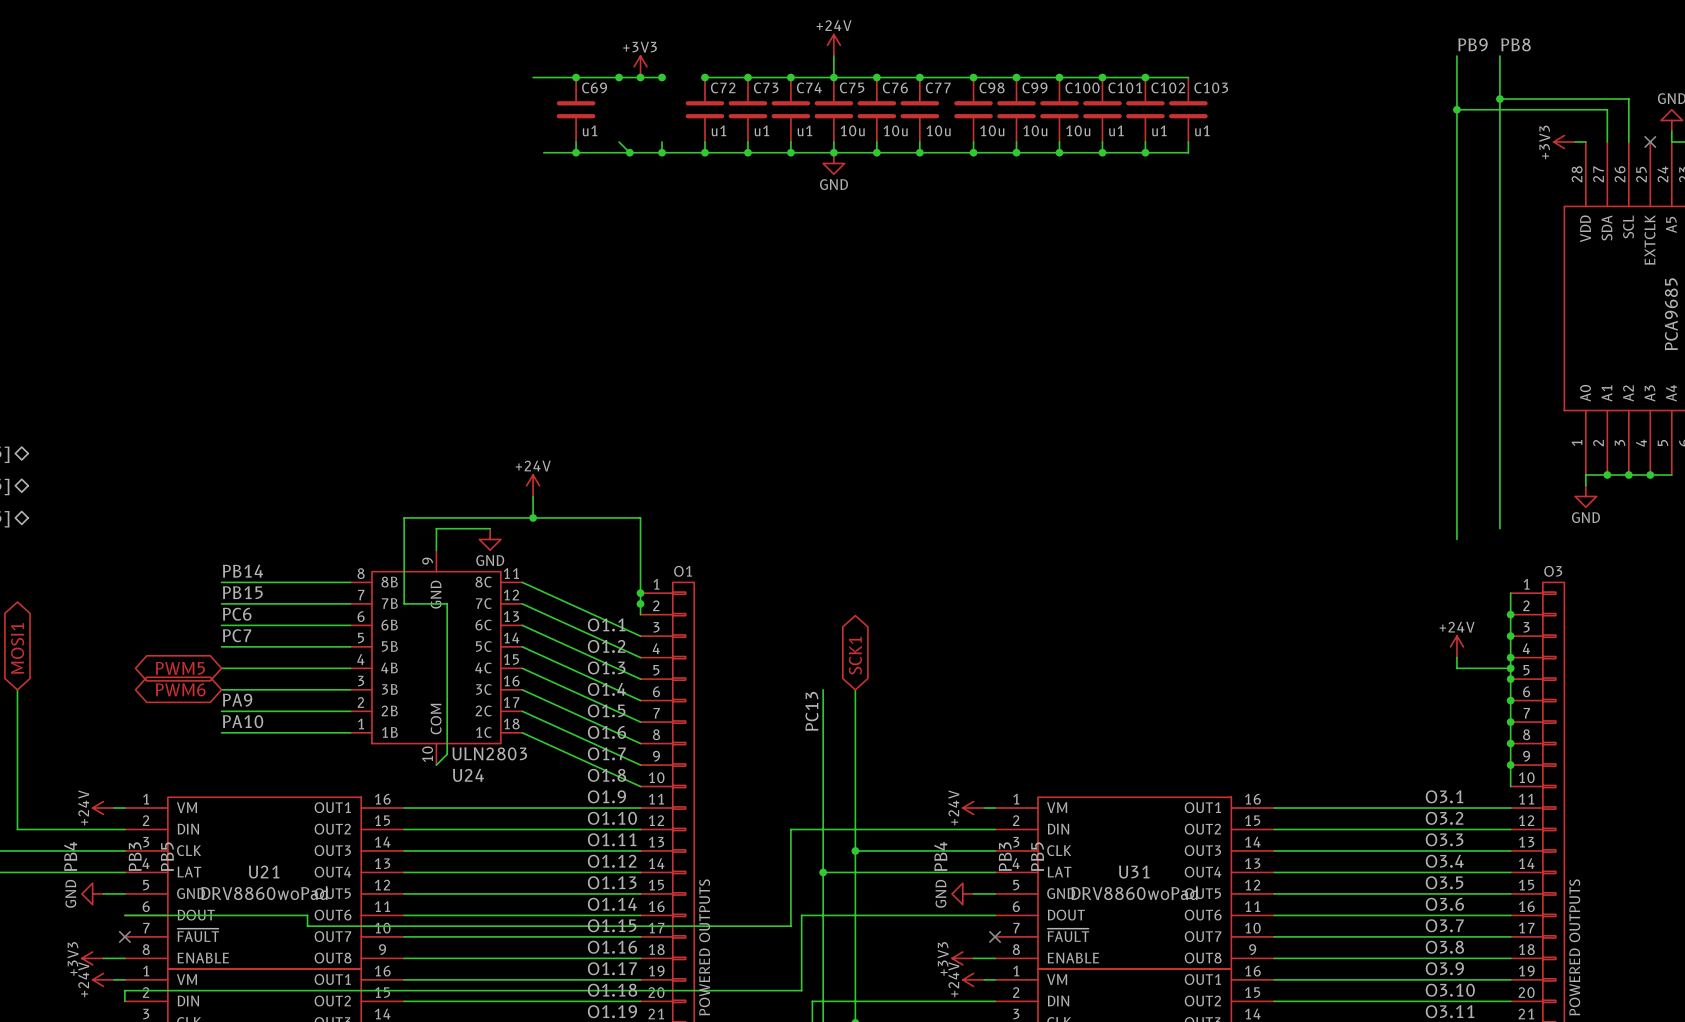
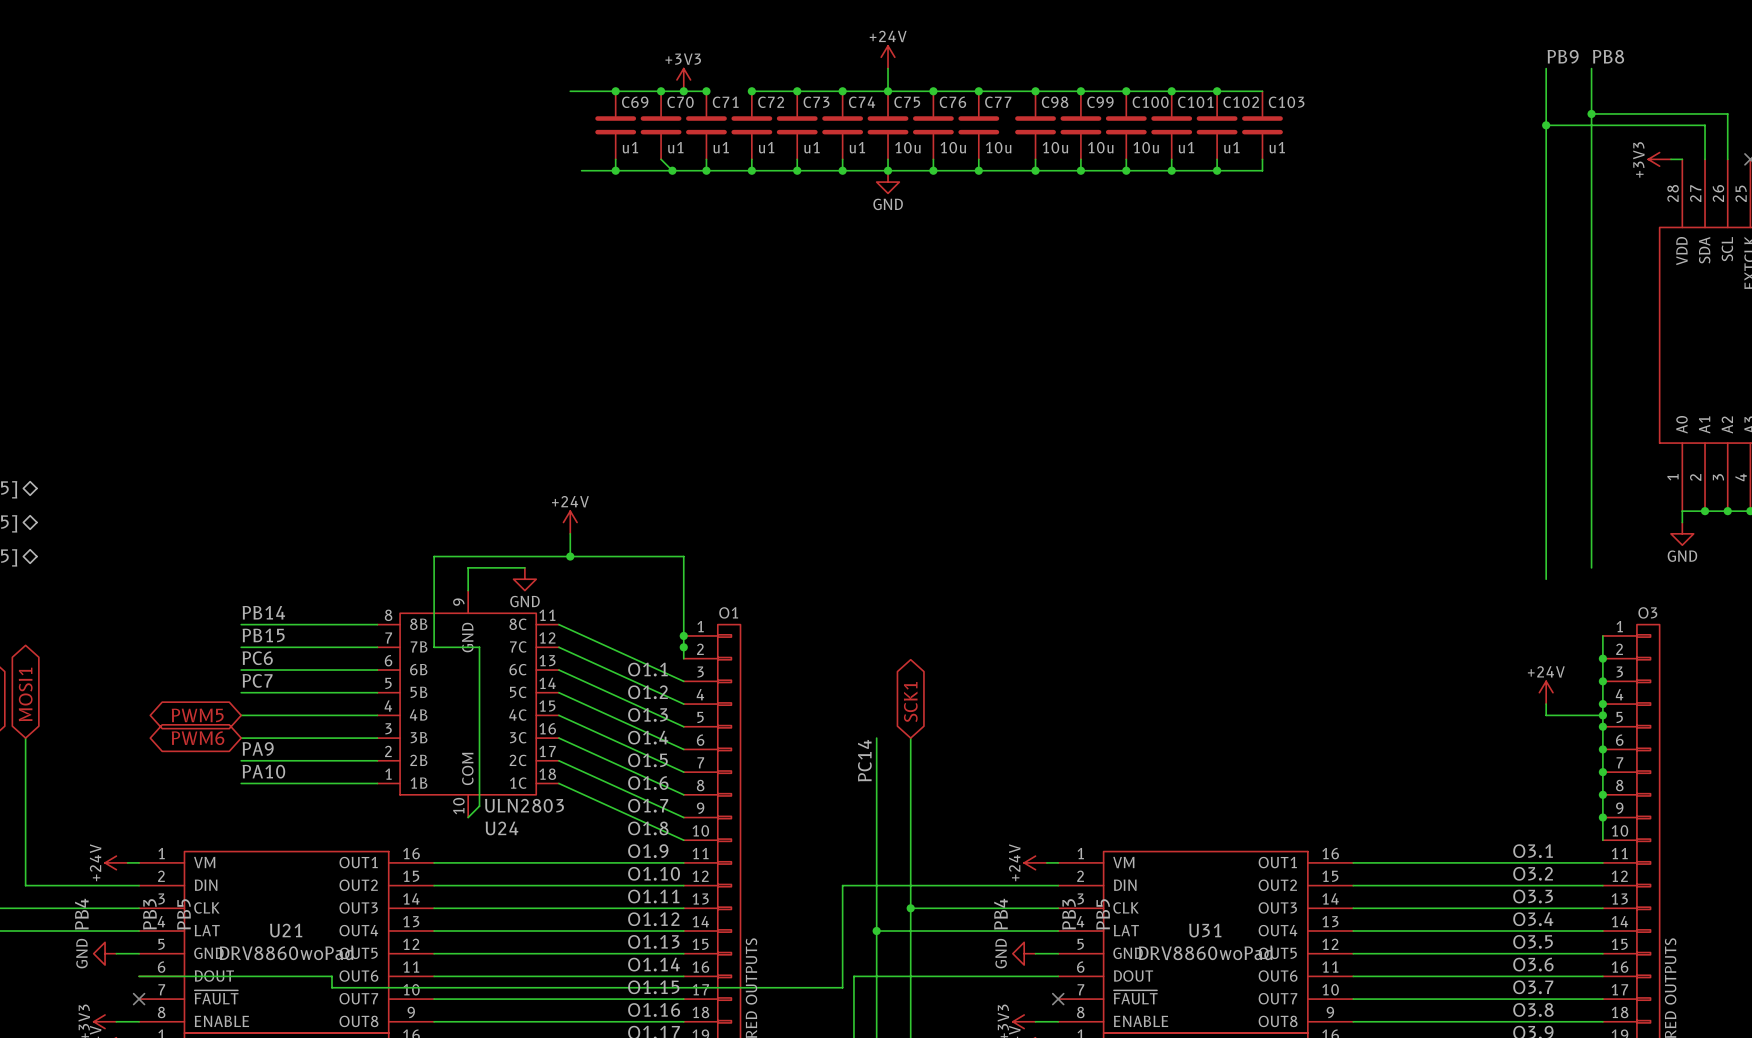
C70: none -> u1 (661, 125)
C71: none -> u1 (706, 125)
label: PC13 (811, 711) -> PC14 (864, 760)

